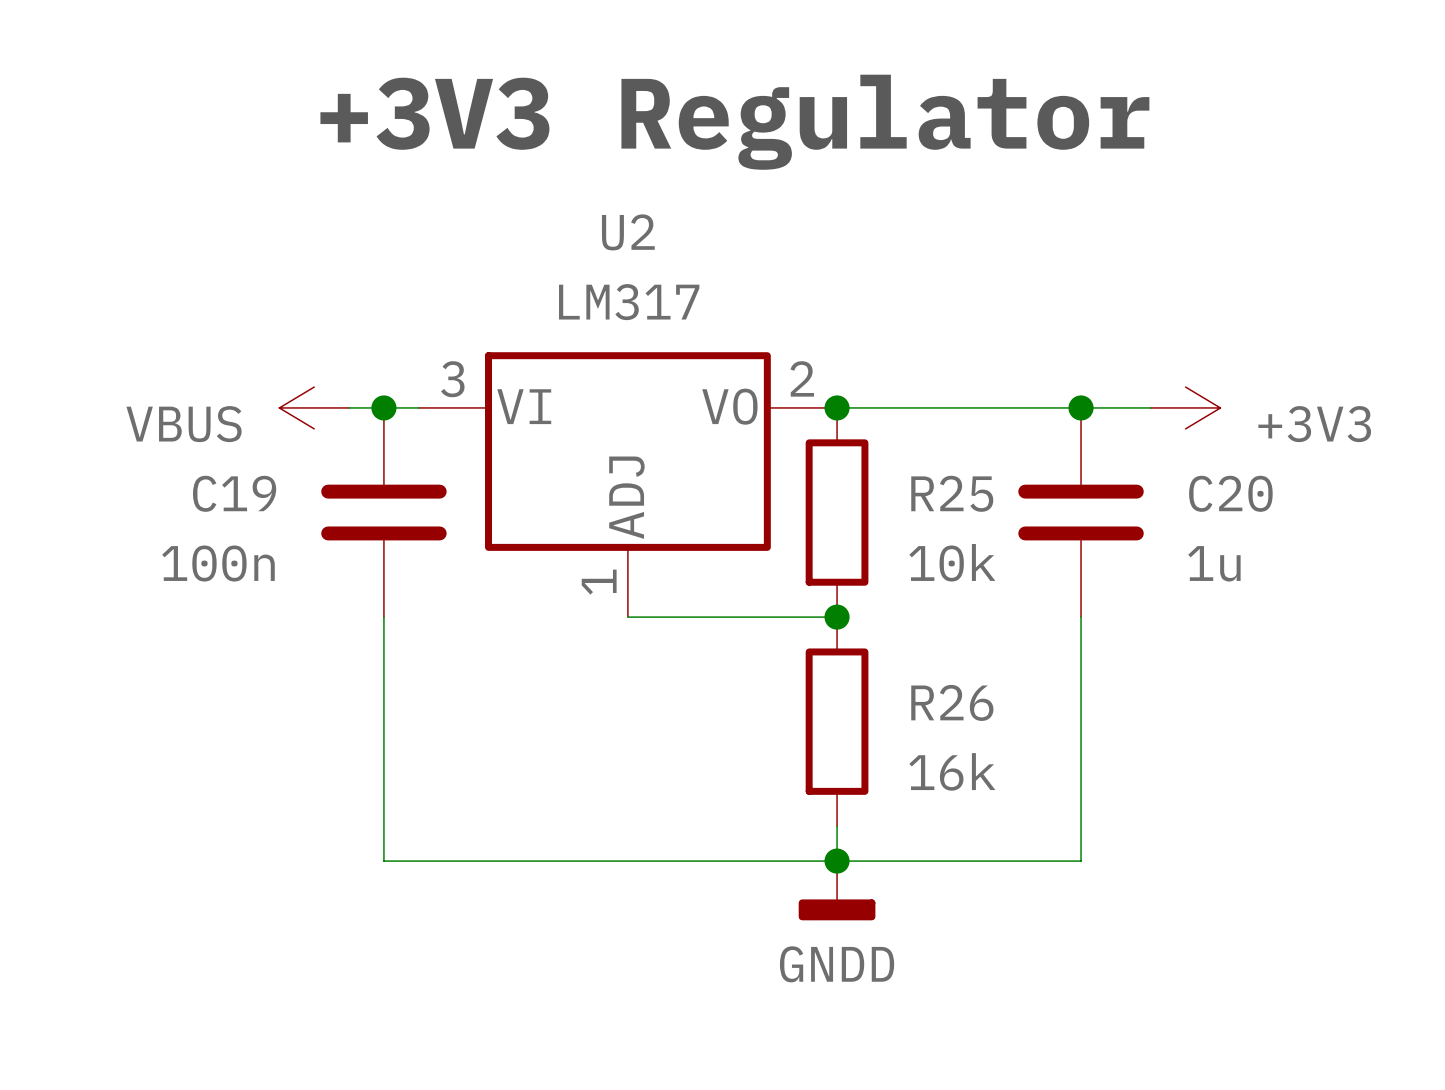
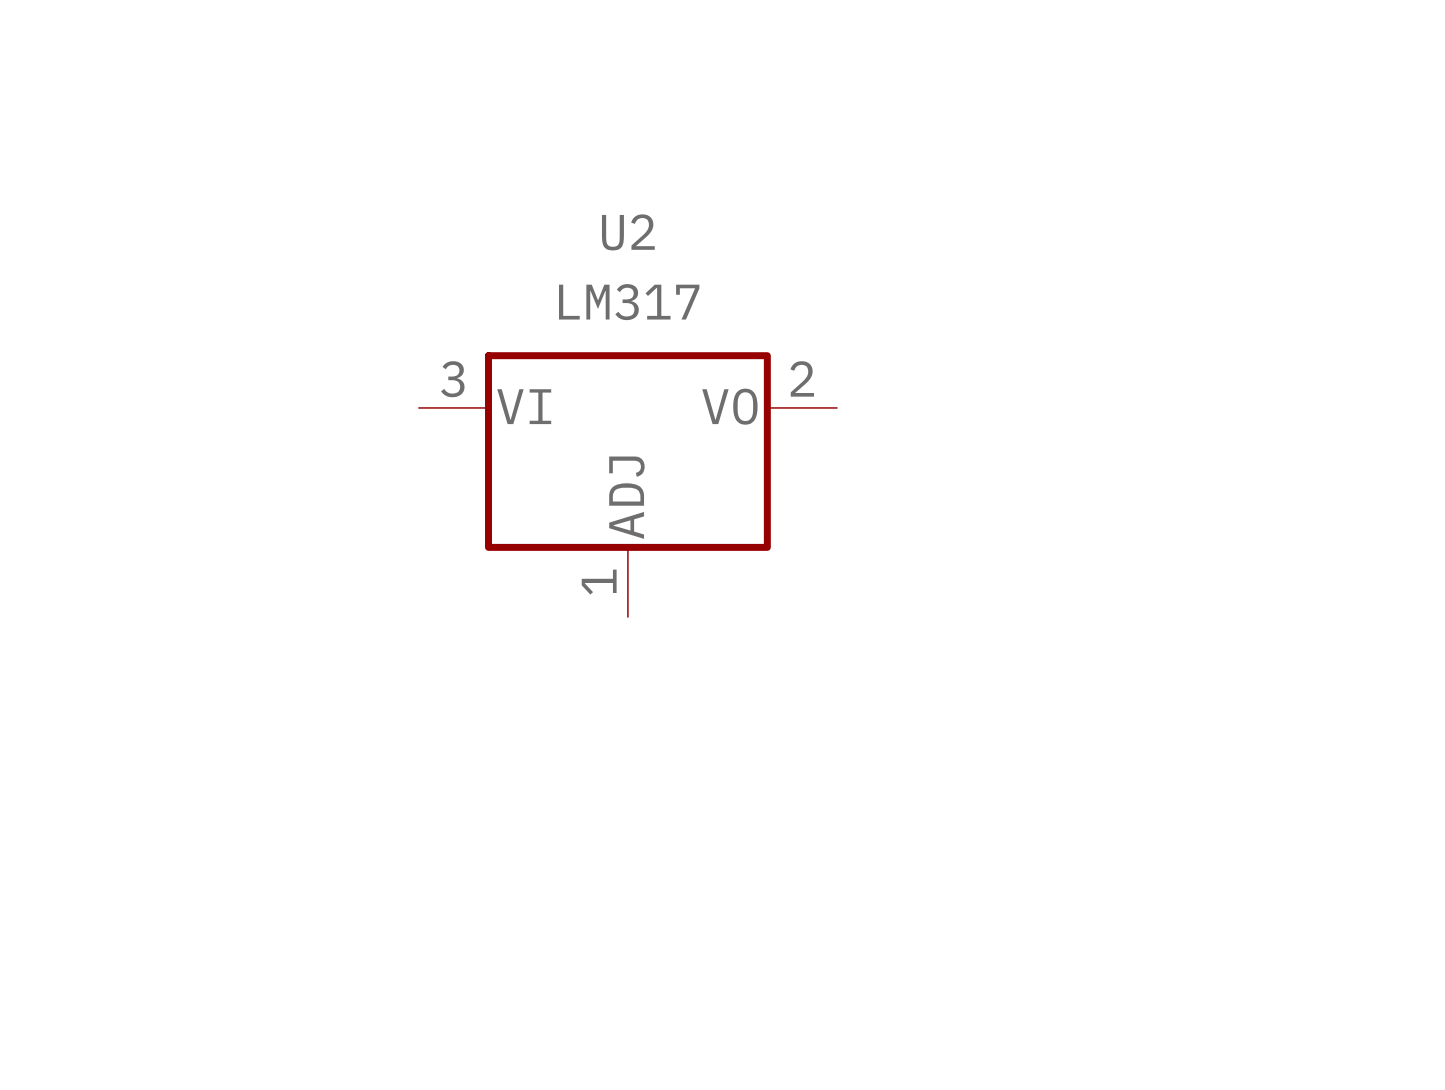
text: +3V3 Regulator (734, 122) -> none
power symbol: VBUS (314, 407) -> none
wire: (349, 407) (418, 407) -> none
junction: (383, 407) -> none
wire: (837, 407) (1150, 407) -> none
junction: (837, 407) -> none
junction: (1081, 407) -> none
power symbol: +3V3 (1185, 407) -> none
C19: 100n (383, 512) -> none
R25: 10k (837, 512) -> none
C20: 1u (1081, 512) -> none
wire: (383, 617) (383, 861) (1081, 861) (1081, 617) -> none
wire: (627, 617) (837, 617) -> none
junction: (837, 617) -> none
R26: 16k (837, 721) -> none
wire: (837, 826) (837, 861) -> none
junction: (837, 861) -> none
power symbol: GNDD (837, 890) -> none

